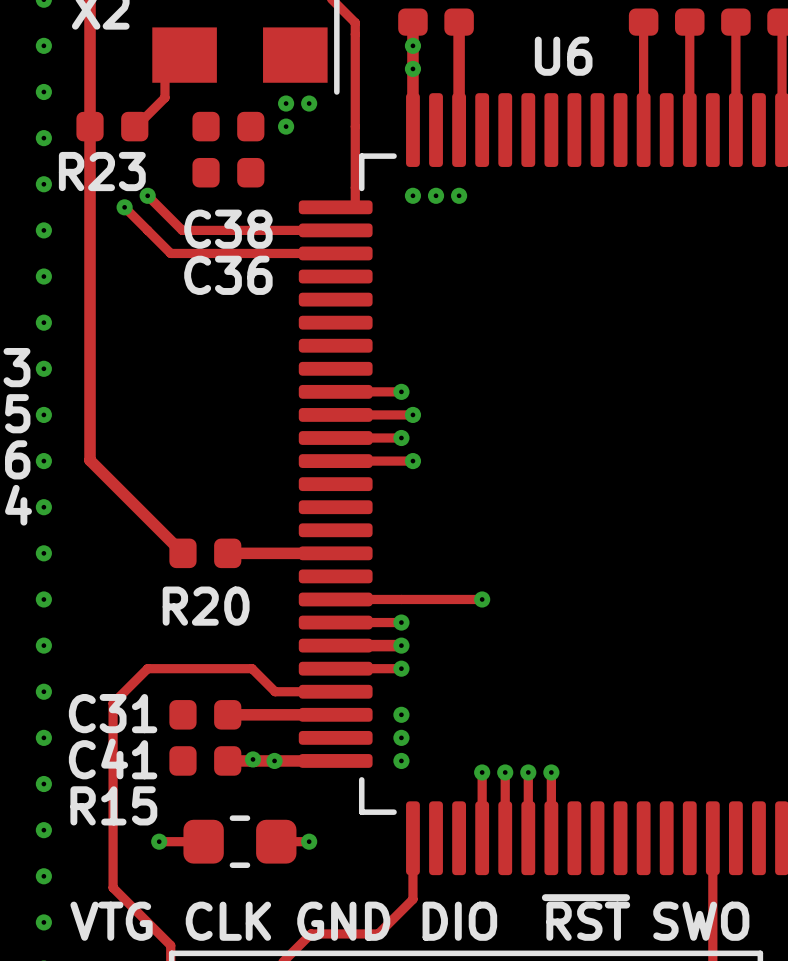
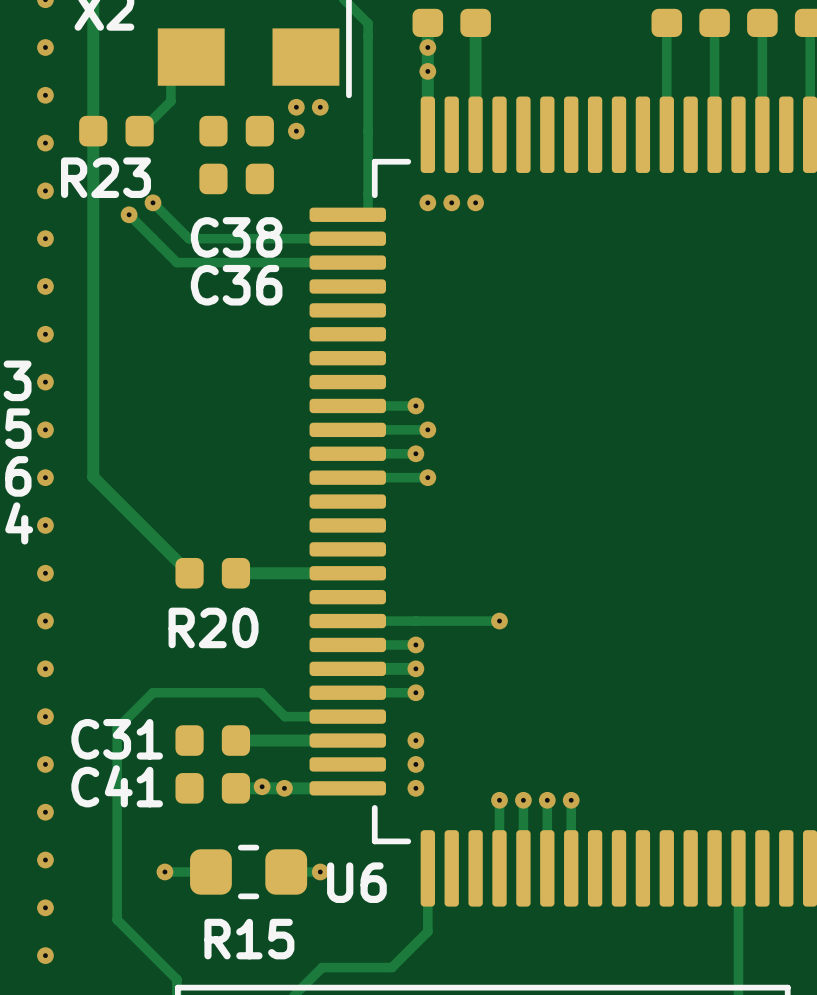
U6 name position: U6 (563, 56) -> U6 (356, 882)
R15 name position: R15 (113, 805) -> R15 (249, 939)
text: ~{RST} (586, 917) -> none
text: VTG (111, 921) -> none
text: CLK (228, 921) -> none
text: GND (343, 921) -> none
text: DIO (459, 921) -> none
text: SWO (701, 921) -> none

